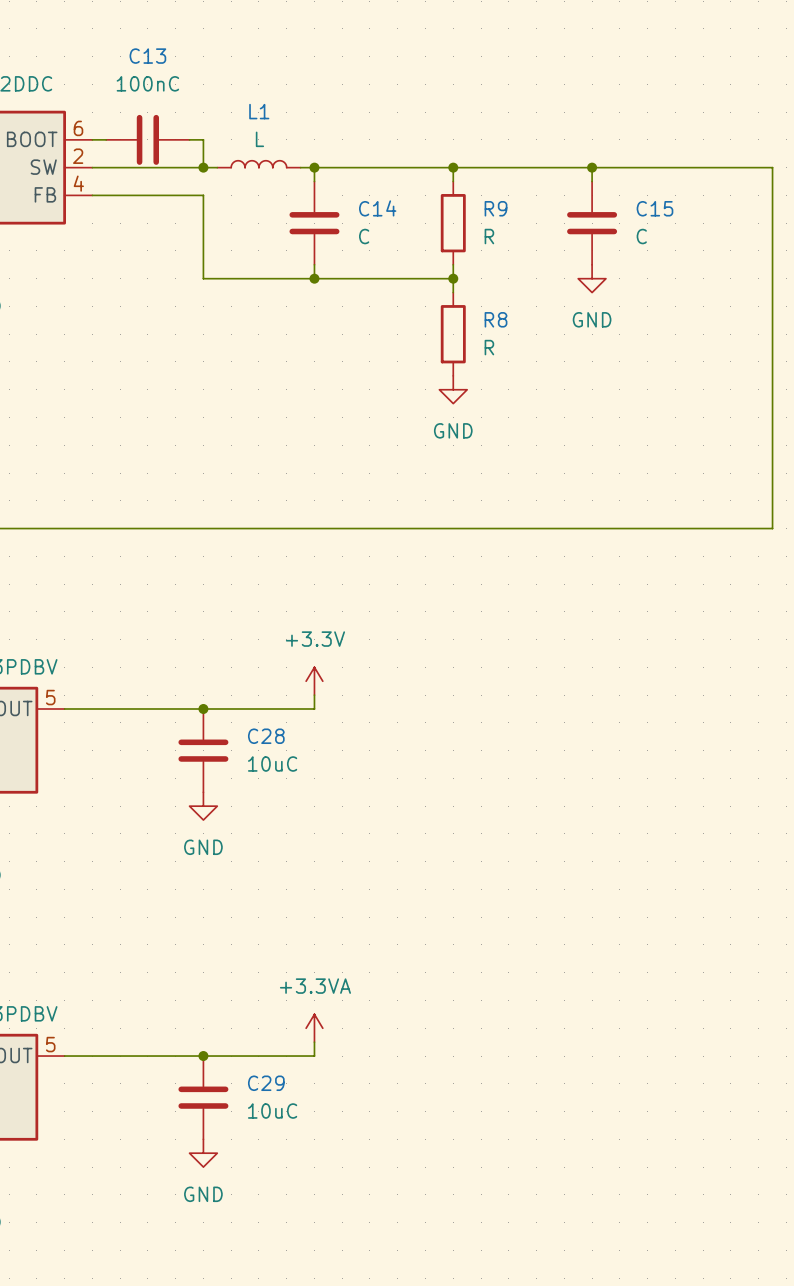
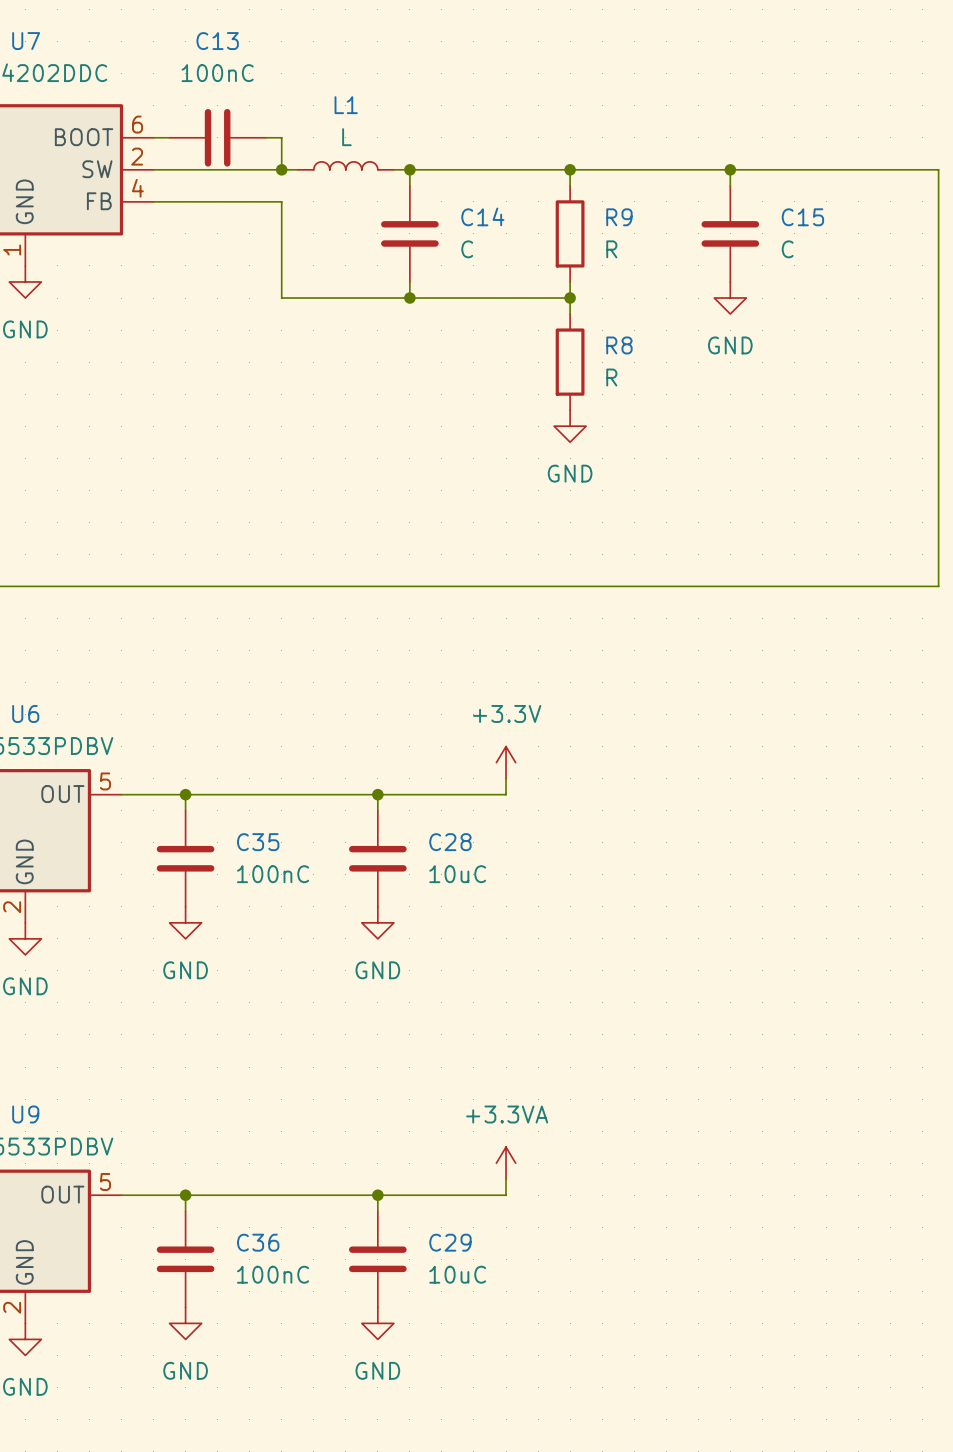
power symbol position: +3.3V (314, 681) -> +3.3V (506, 762)
wire: (314, 695) (314, 708) -> (506, 778) (506, 794) (409, 794)
wire: none -> (185, 794) (185, 810)
junction: none -> (185, 794)
junction: (203, 708) -> none
wire: none -> (377, 794) (377, 810)
junction: none -> (377, 794)
C28 position: (203, 750) -> (377, 858)
C35: none -> 100nC (185, 858)
power symbol: GND (203, 806) -> none
power symbol: none -> GND (185, 922)
power symbol: none -> GND (377, 922)
power symbol position: +3.3VA (314, 1028) -> +3.3VA (506, 1163)
wire: (314, 1042) (314, 1056) -> (506, 1179) (506, 1195) (409, 1195)
wire: none -> (185, 1195) (185, 1211)
junction: none -> (185, 1195)
junction: (203, 1056) -> none
wire: none -> (377, 1195) (377, 1211)
junction: none -> (377, 1195)
C29 position: (203, 1097) -> (377, 1259)
C36: none -> 100nC (185, 1259)
power symbol: GND (203, 1153) -> none
power symbol: none -> GND (185, 1323)
power symbol: none -> GND (377, 1323)

